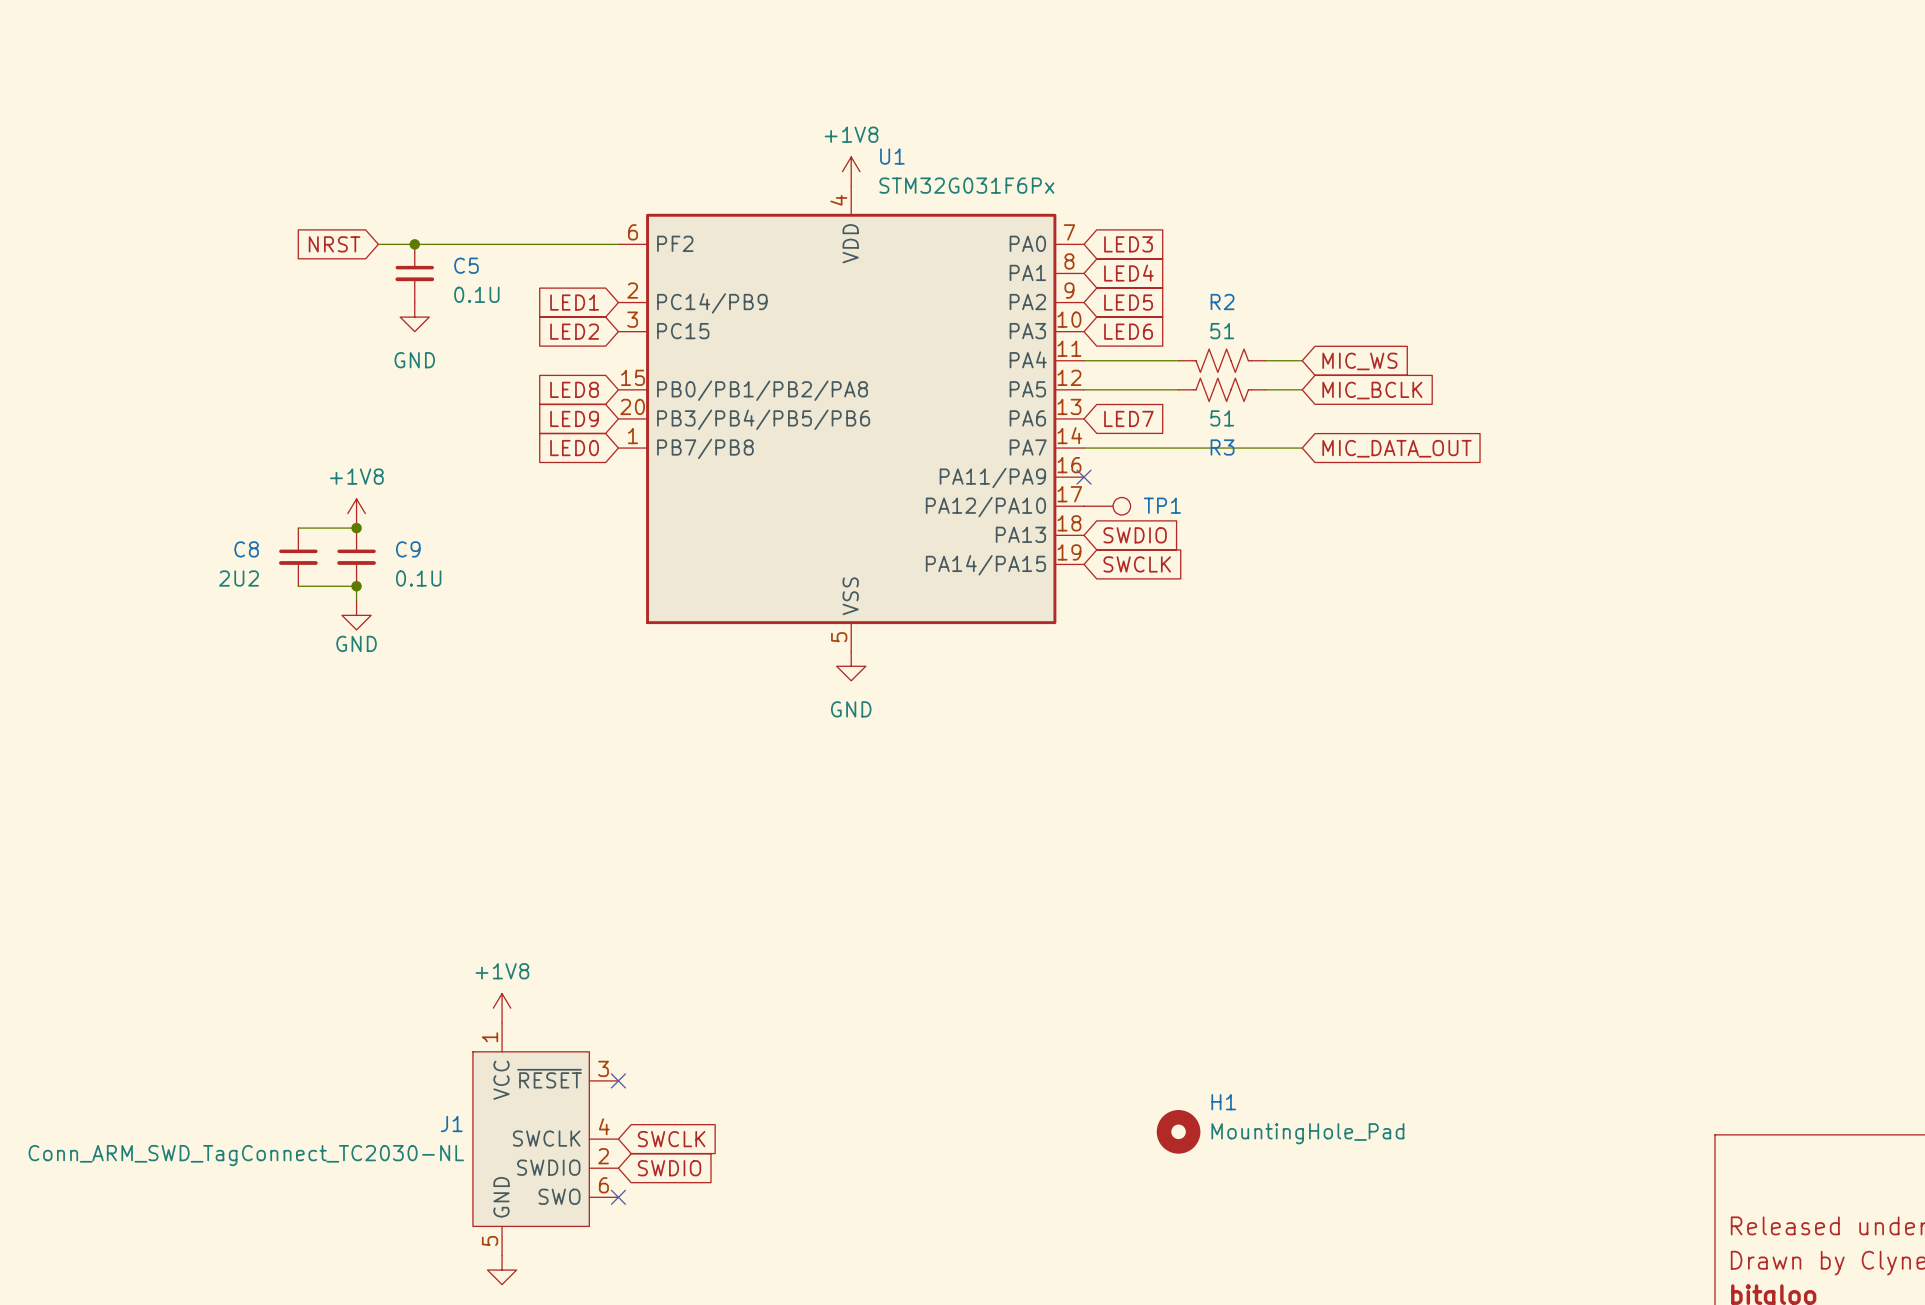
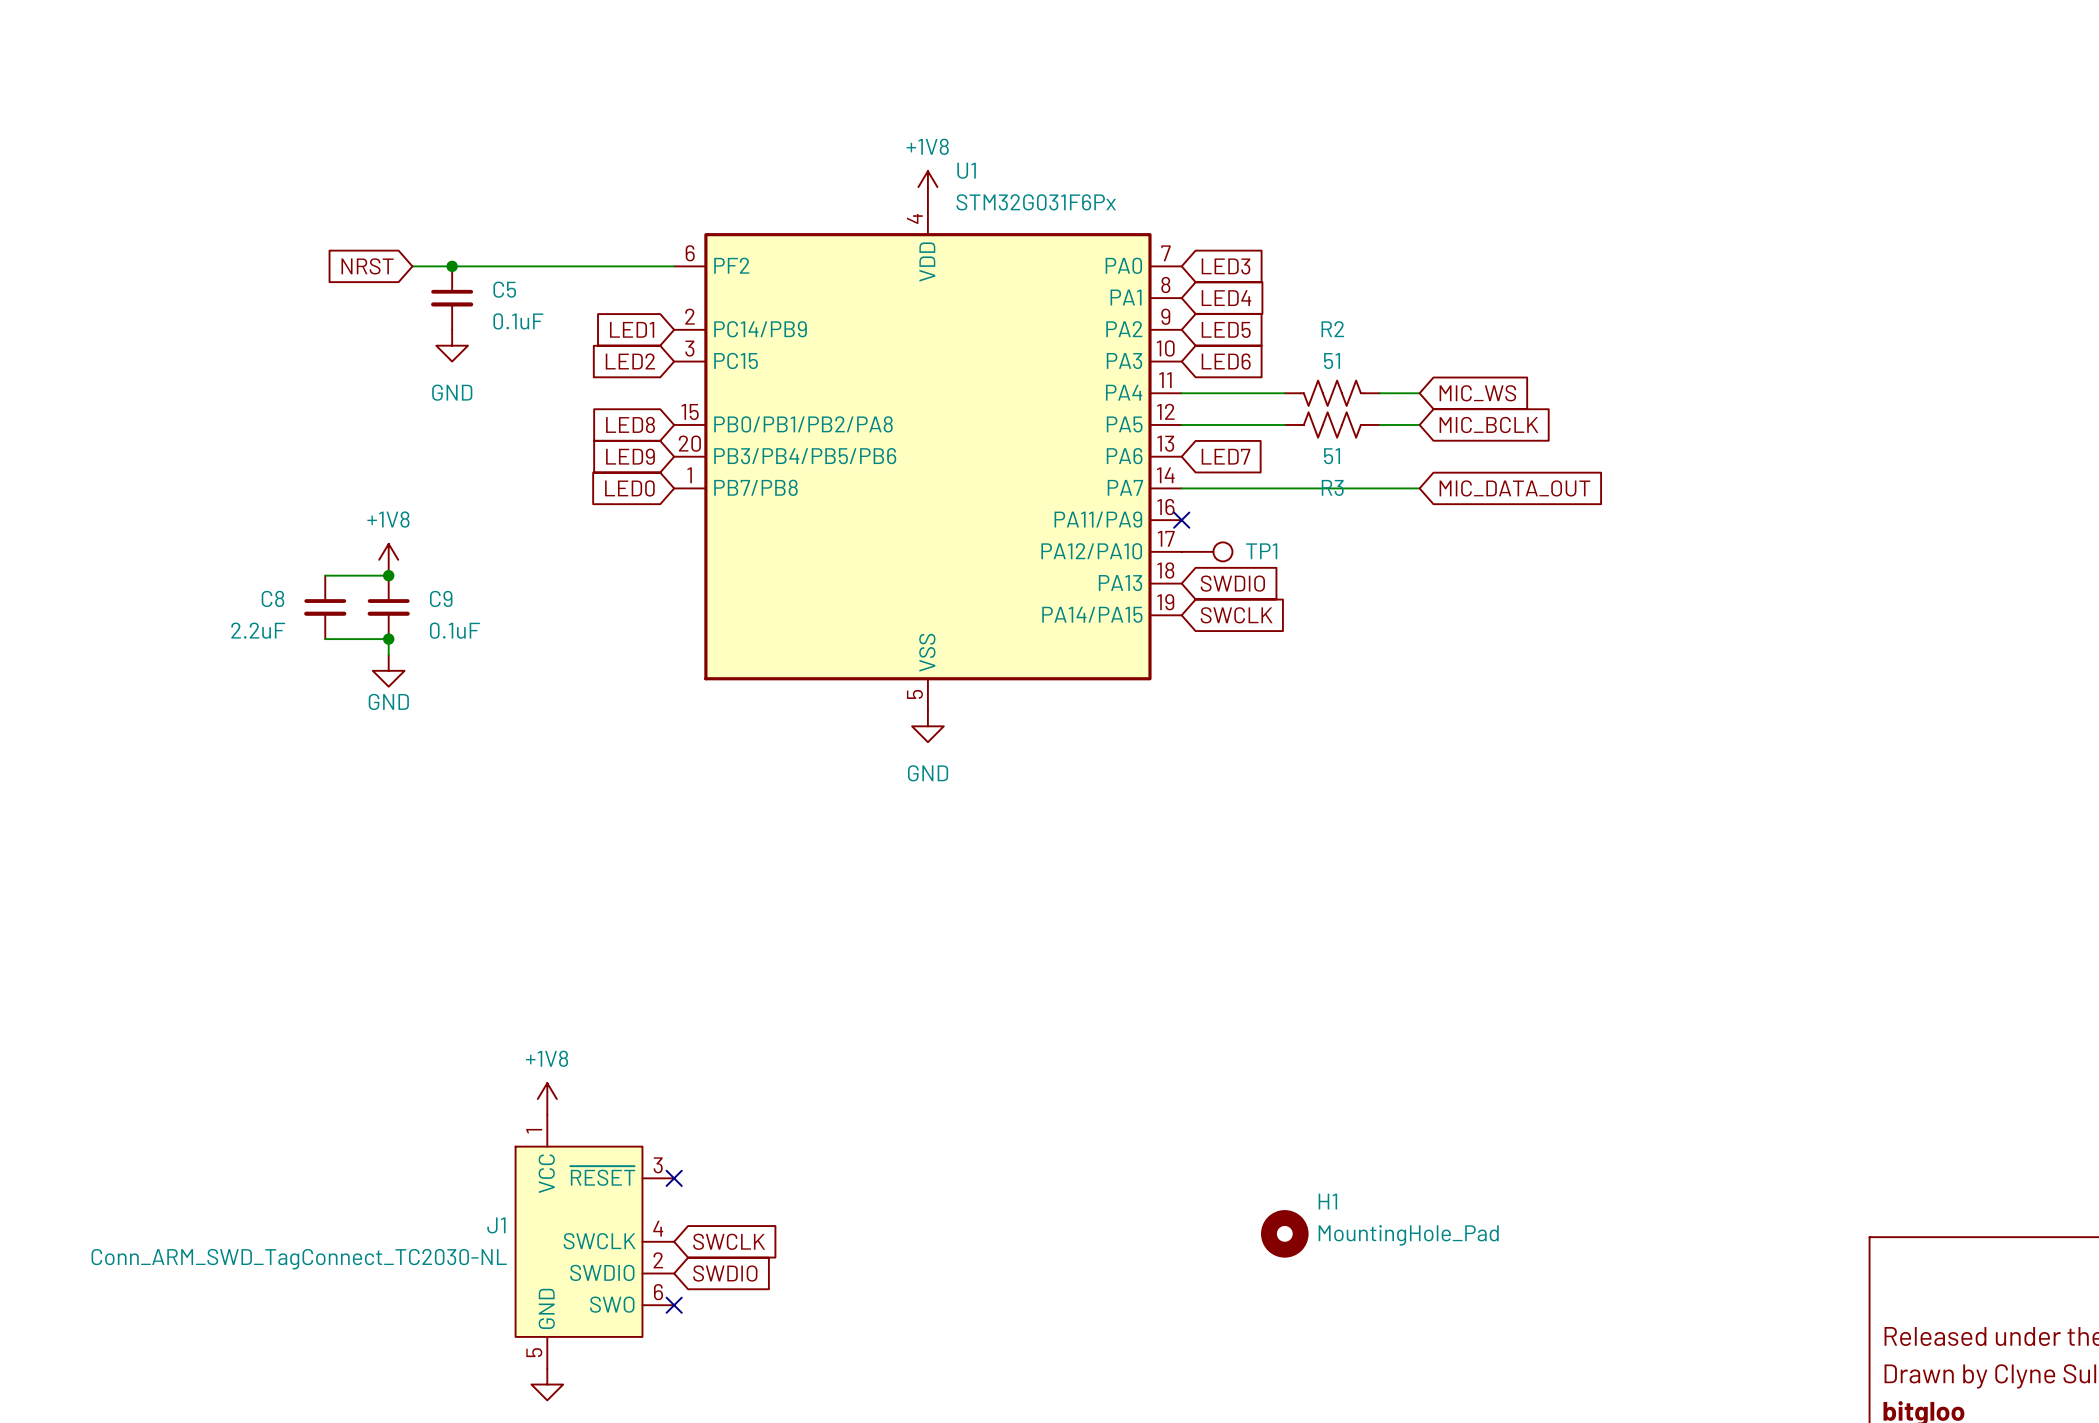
C5 value: 0.1U (476, 294) -> 0.1uF (518, 321)
C8 value: 2U2 (239, 578) -> 2.2uF (258, 630)
C9 value: 0.1U (418, 578) -> 0.1uF (454, 630)

